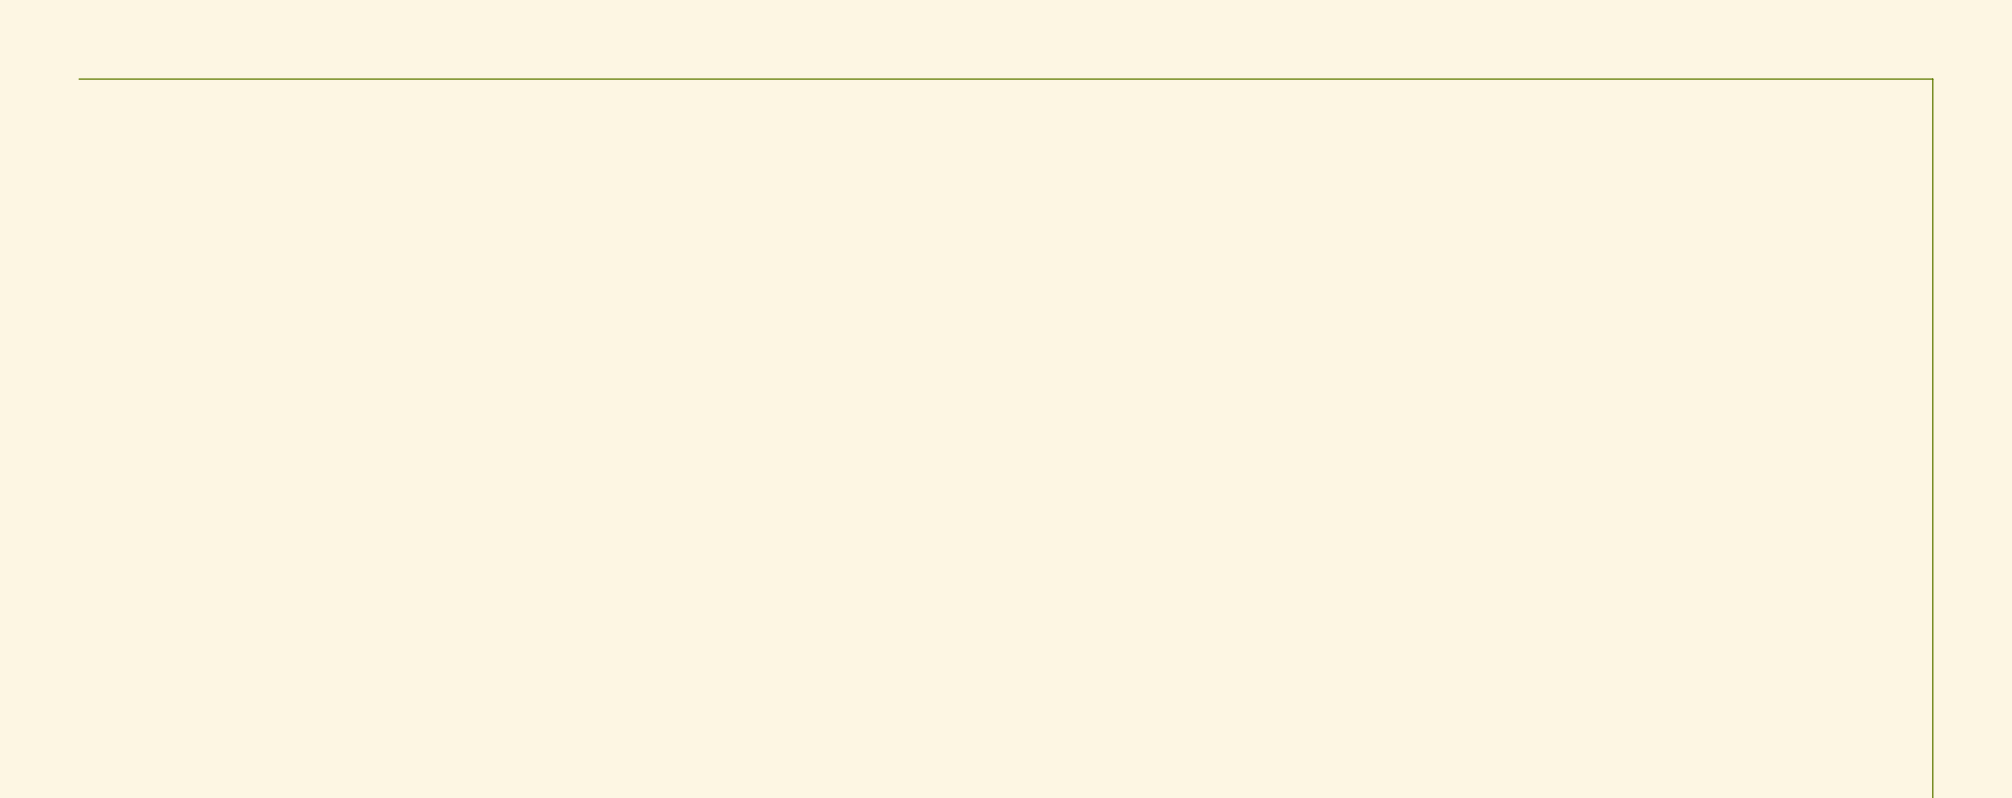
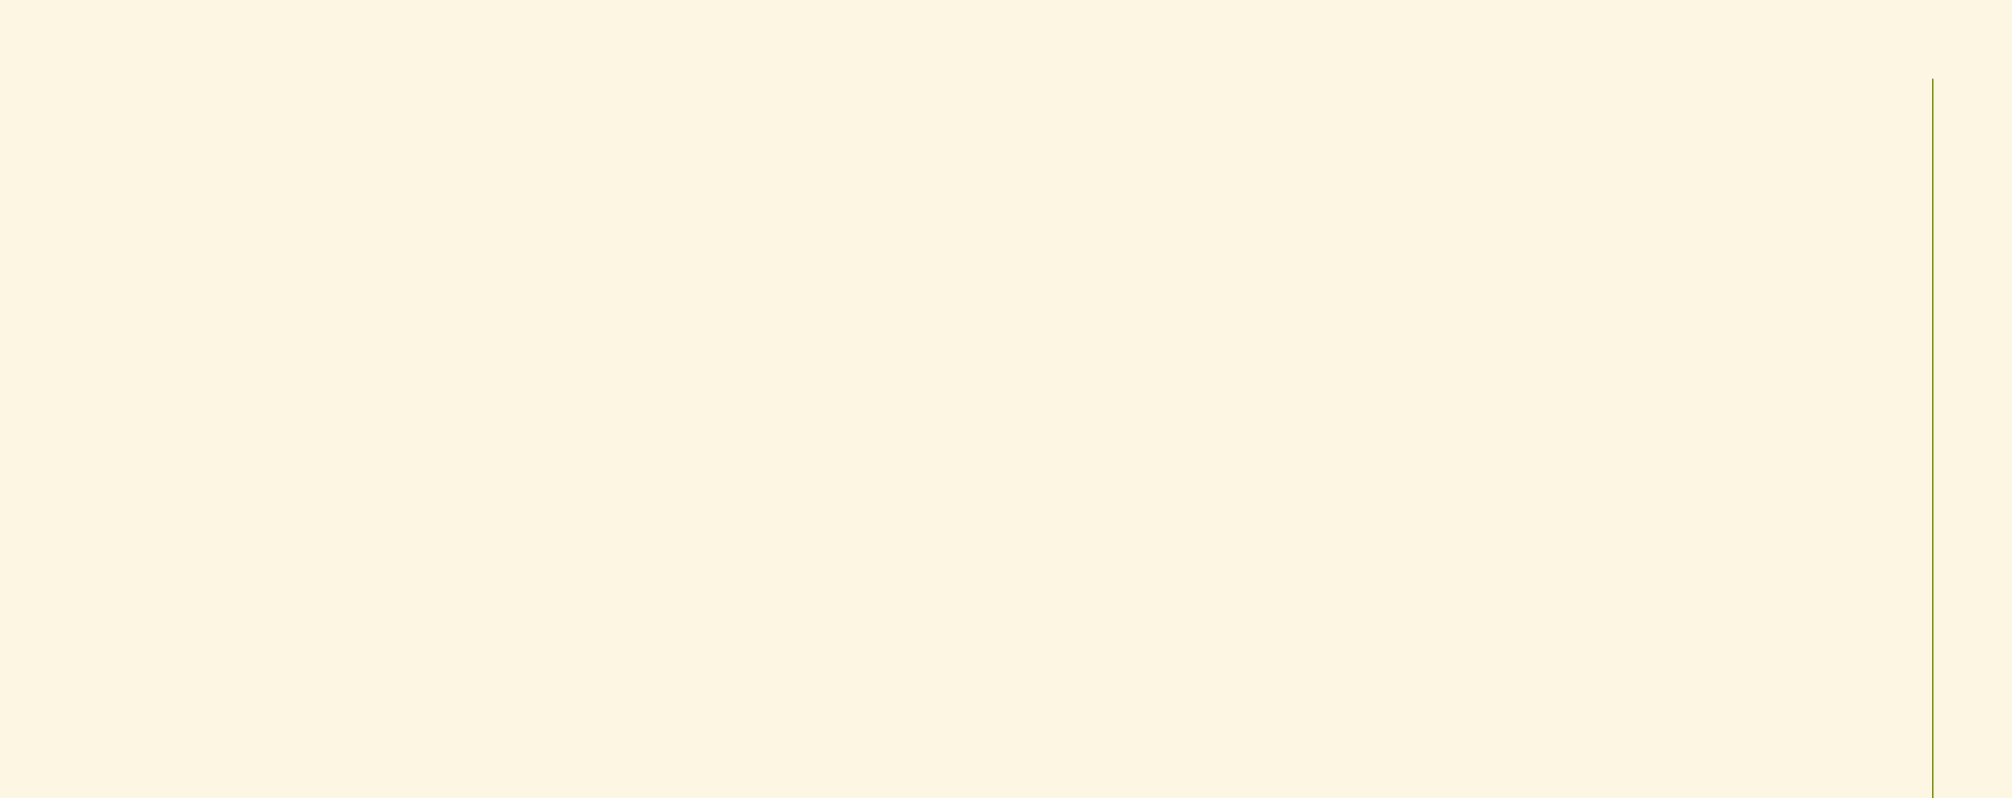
wire: (79, 79) (1932, 79) -> none

